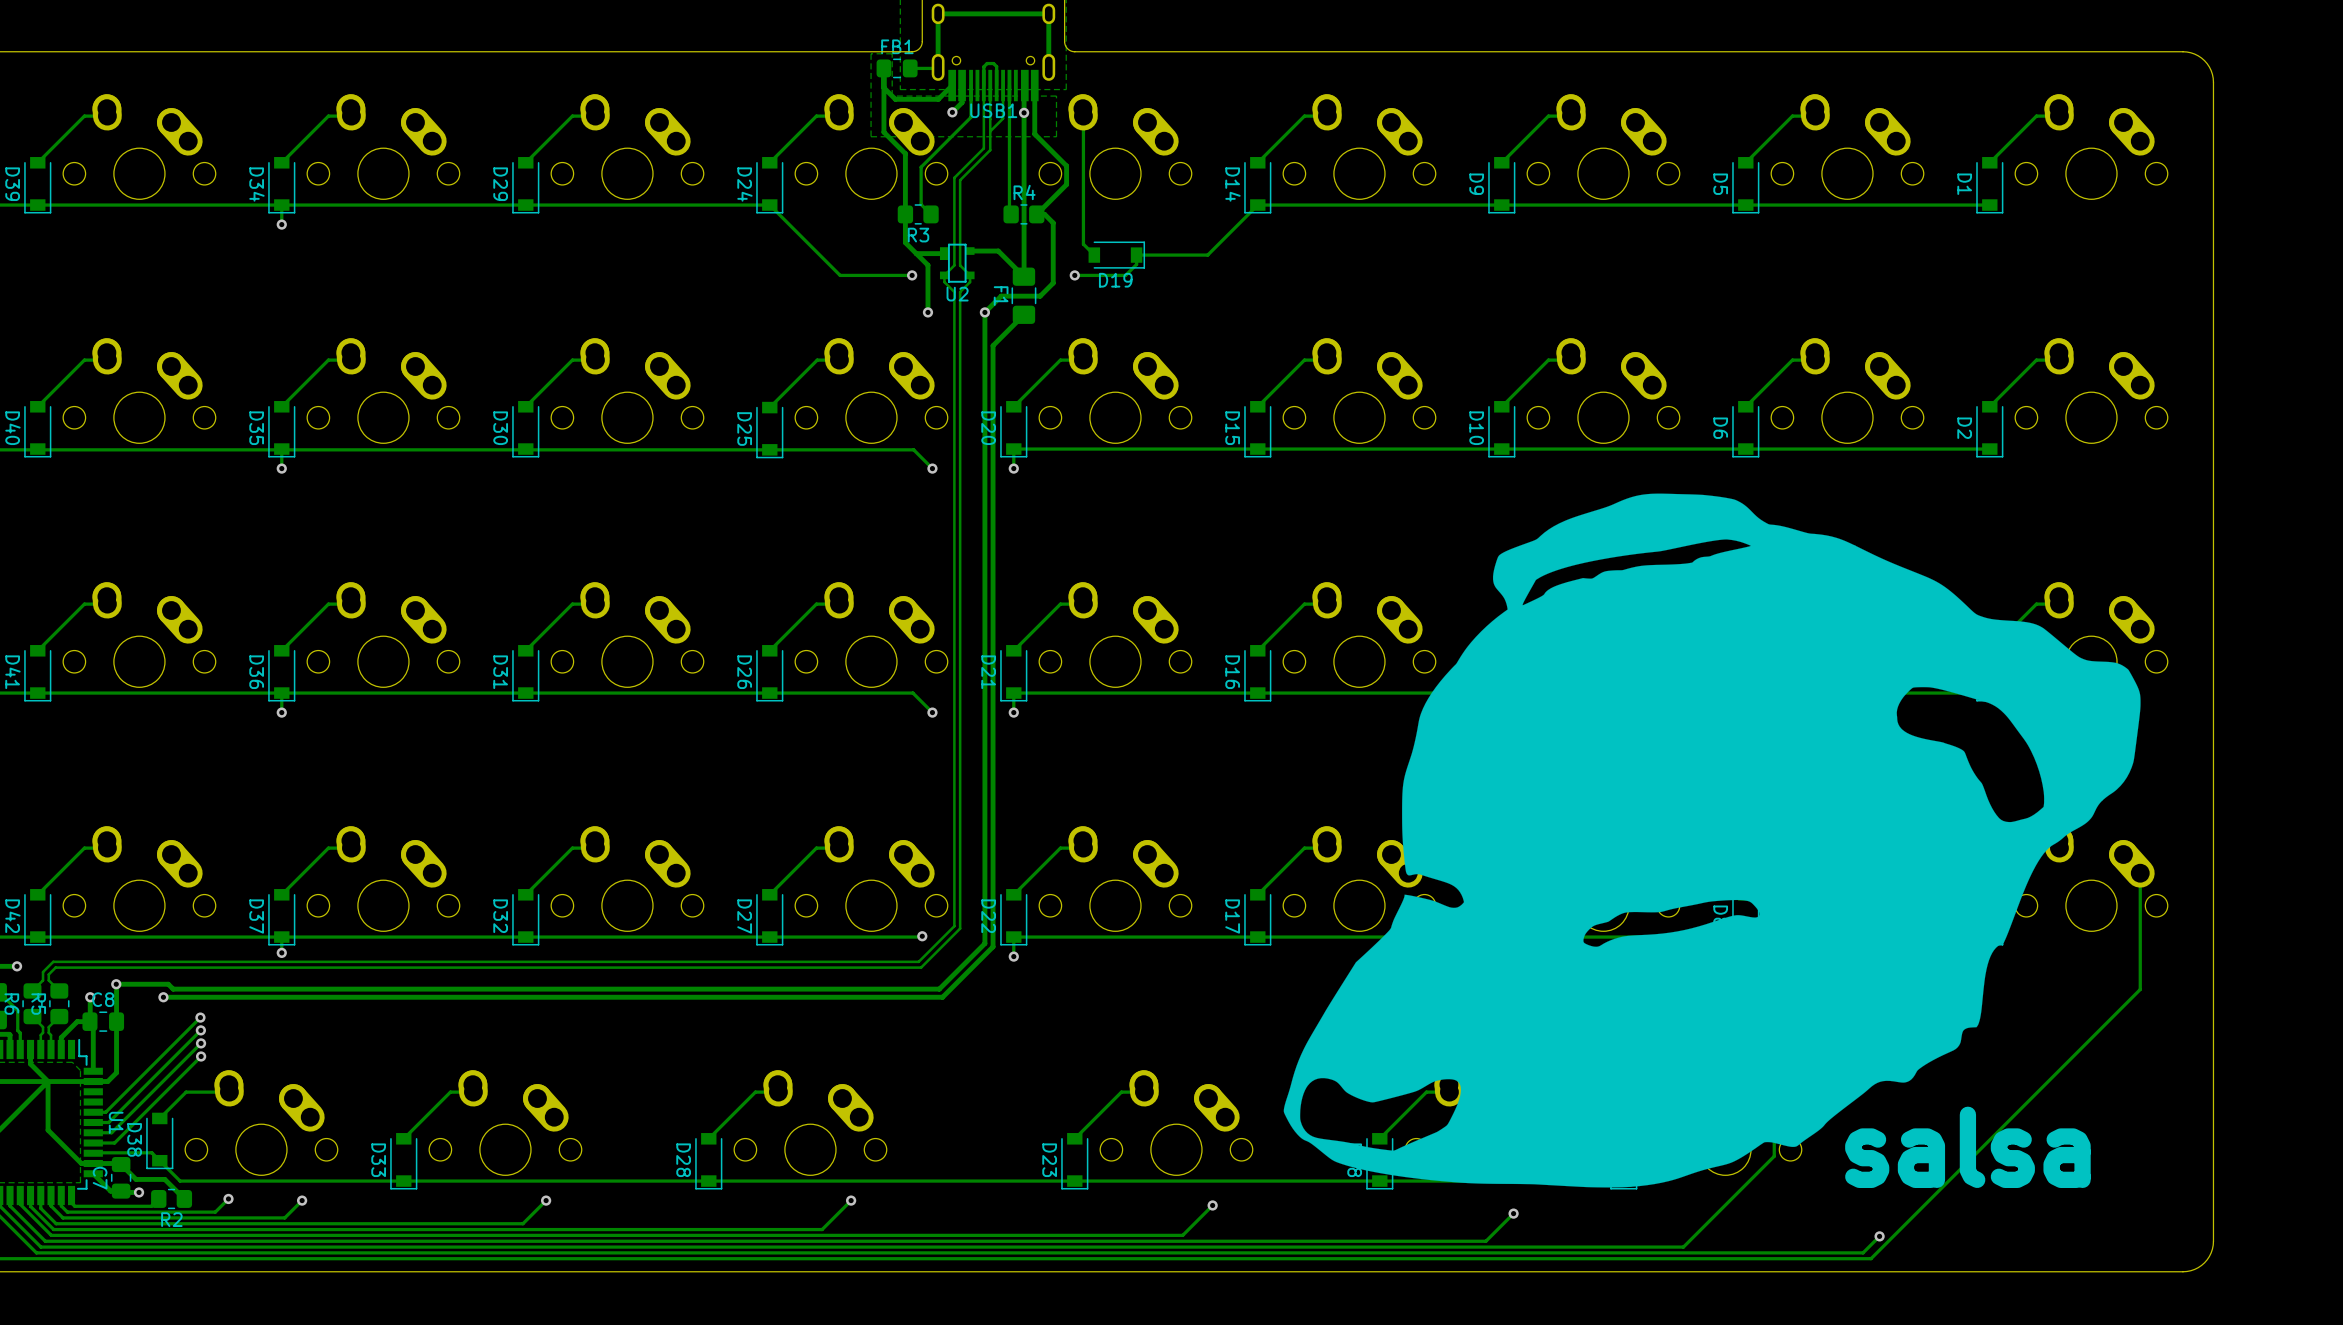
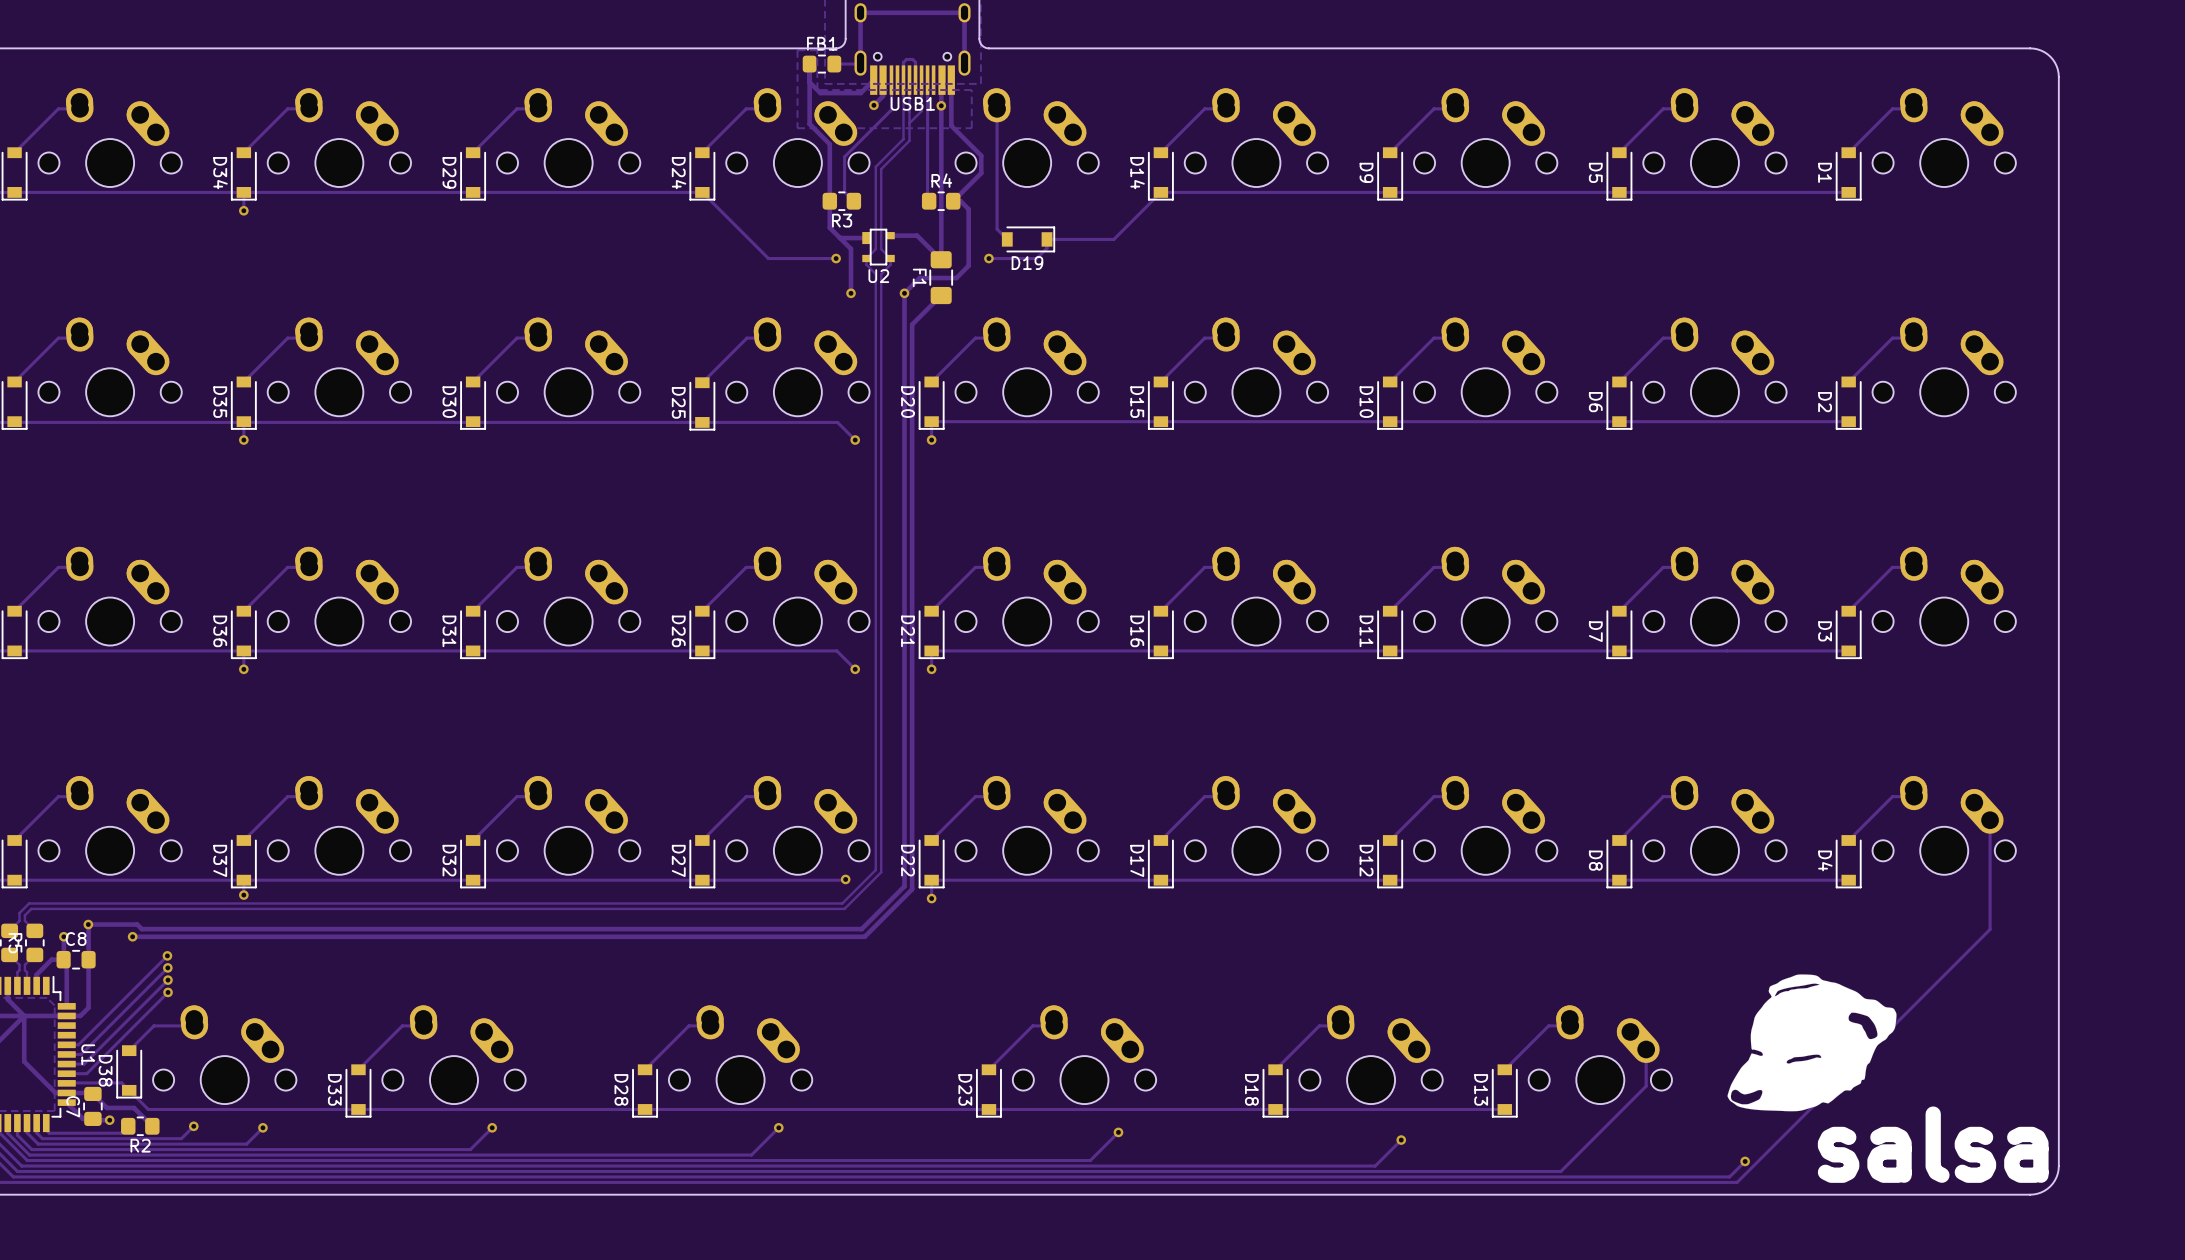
drawing: [1283, 493, 2141, 1188] -> none
drawing: none -> [1727, 974, 1897, 1112]
text position: salsa (1967, 1147) -> salsa (1933, 1144)

